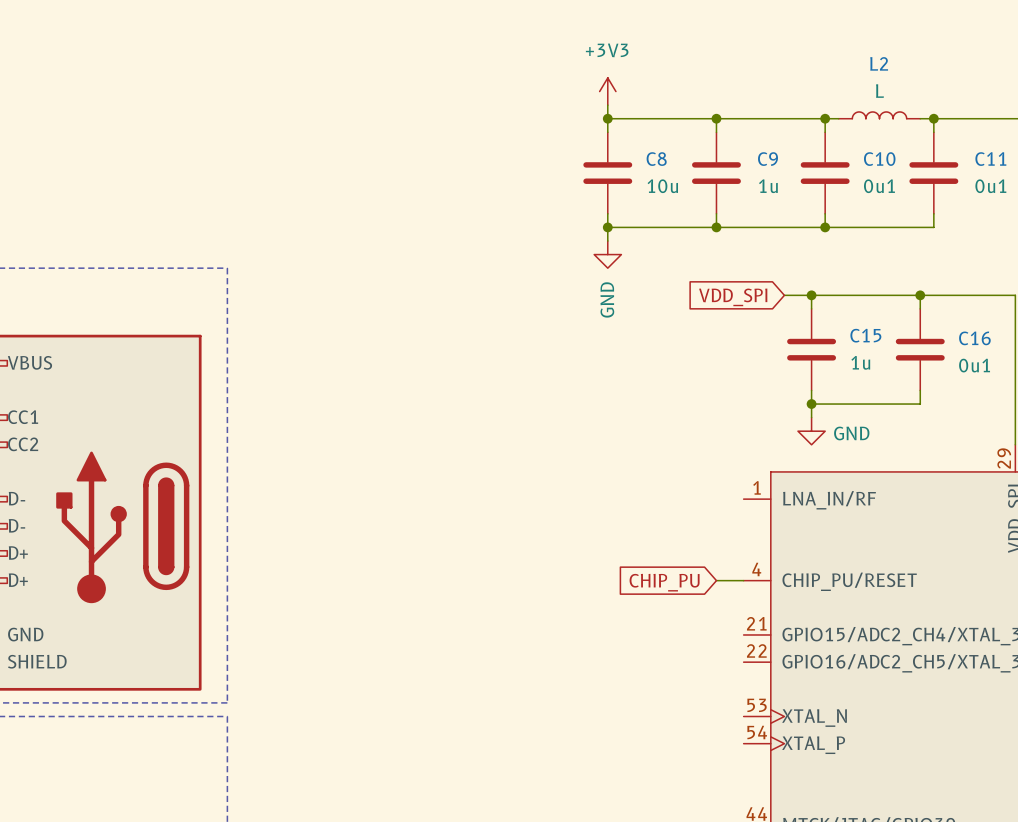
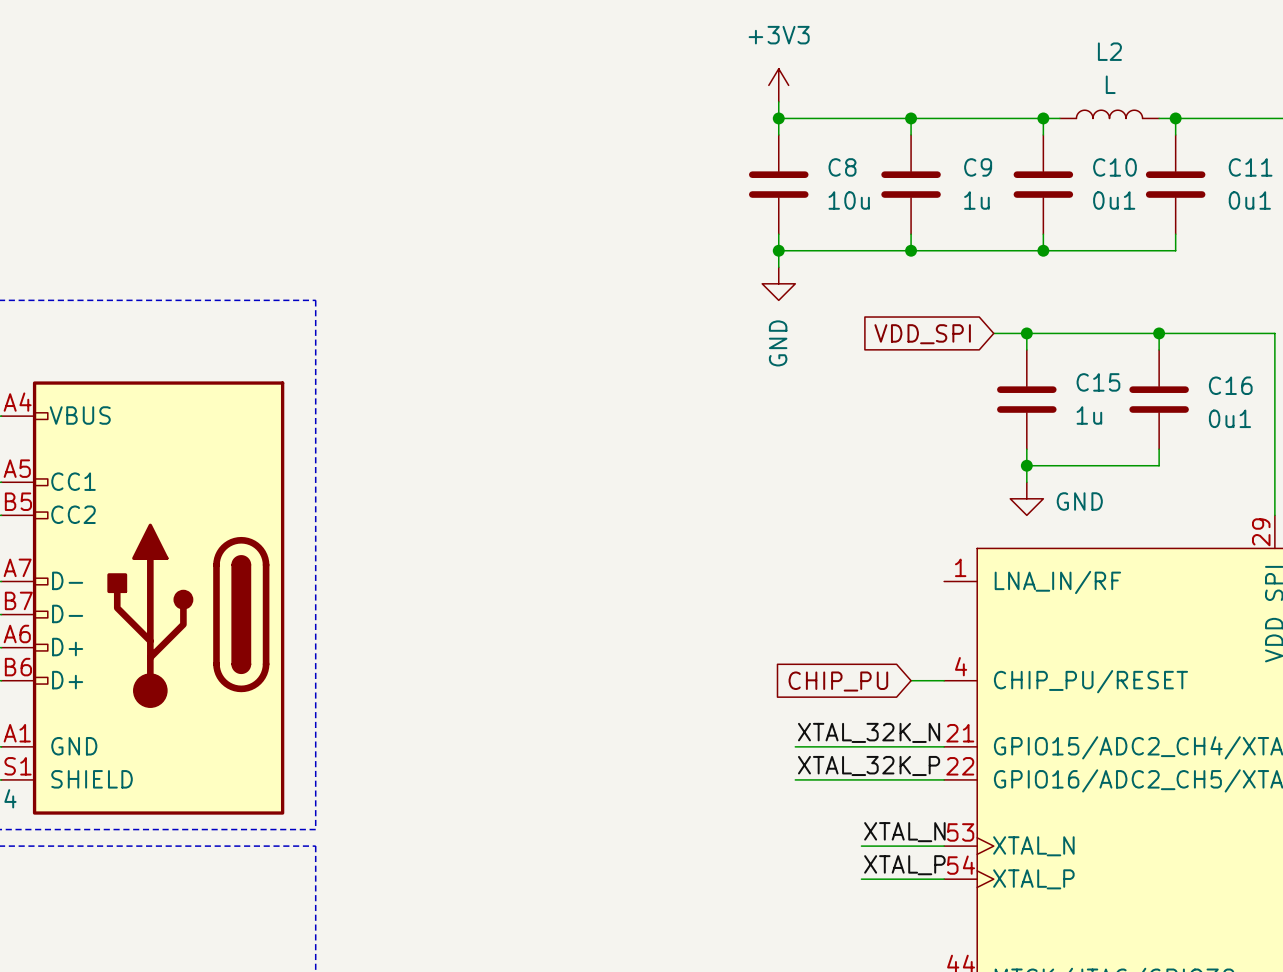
label: none -> XTAL_32K_N (869, 732)
wire: none -> (795, 746) (944, 746)
label: none -> XTAL_32K_P (869, 765)
wire: none -> (795, 779) (944, 779)
label: none -> XTAL_N (904, 832)
wire: none -> (861, 846) (944, 846)
label: none -> XTAL_P (904, 865)
wire: none -> (861, 879) (944, 879)

